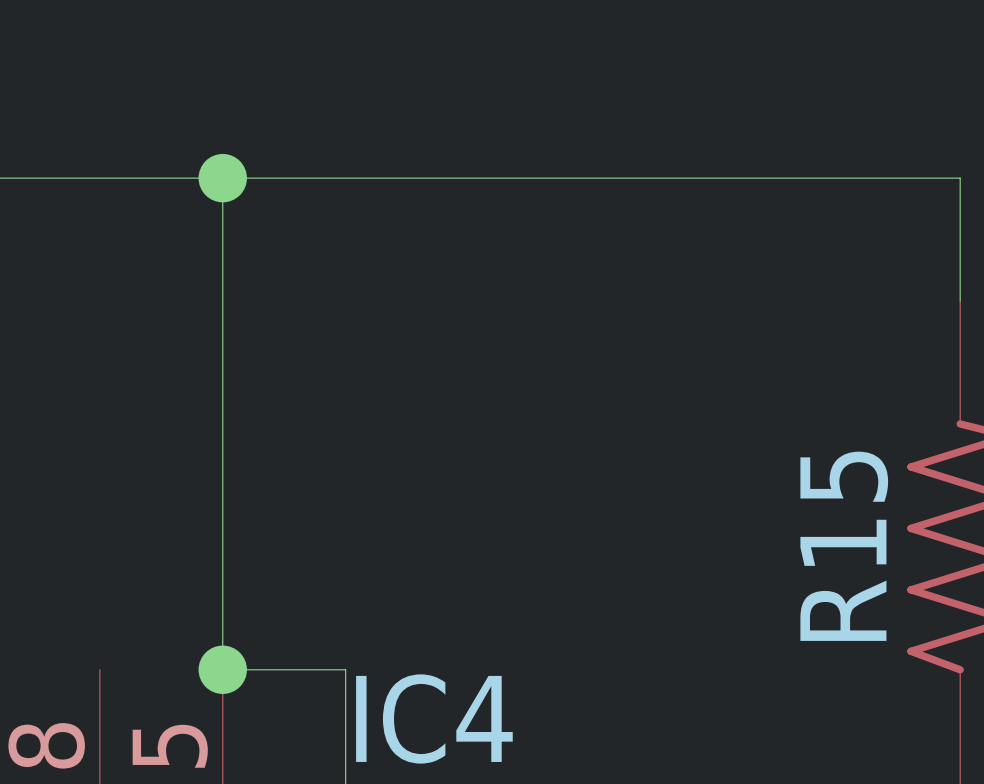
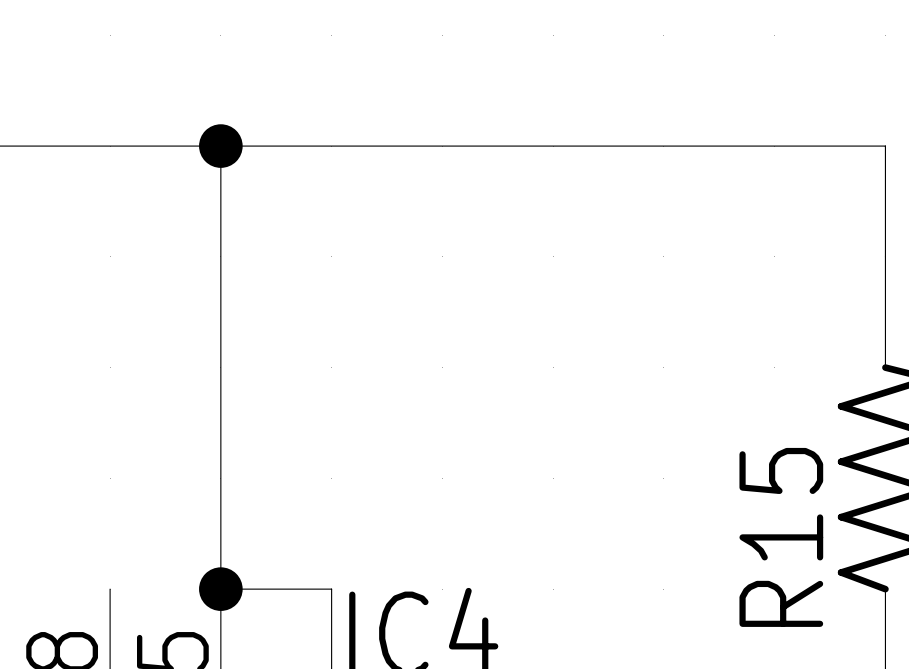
R15 name position: R15 (844, 546) -> R15 (781, 537)

